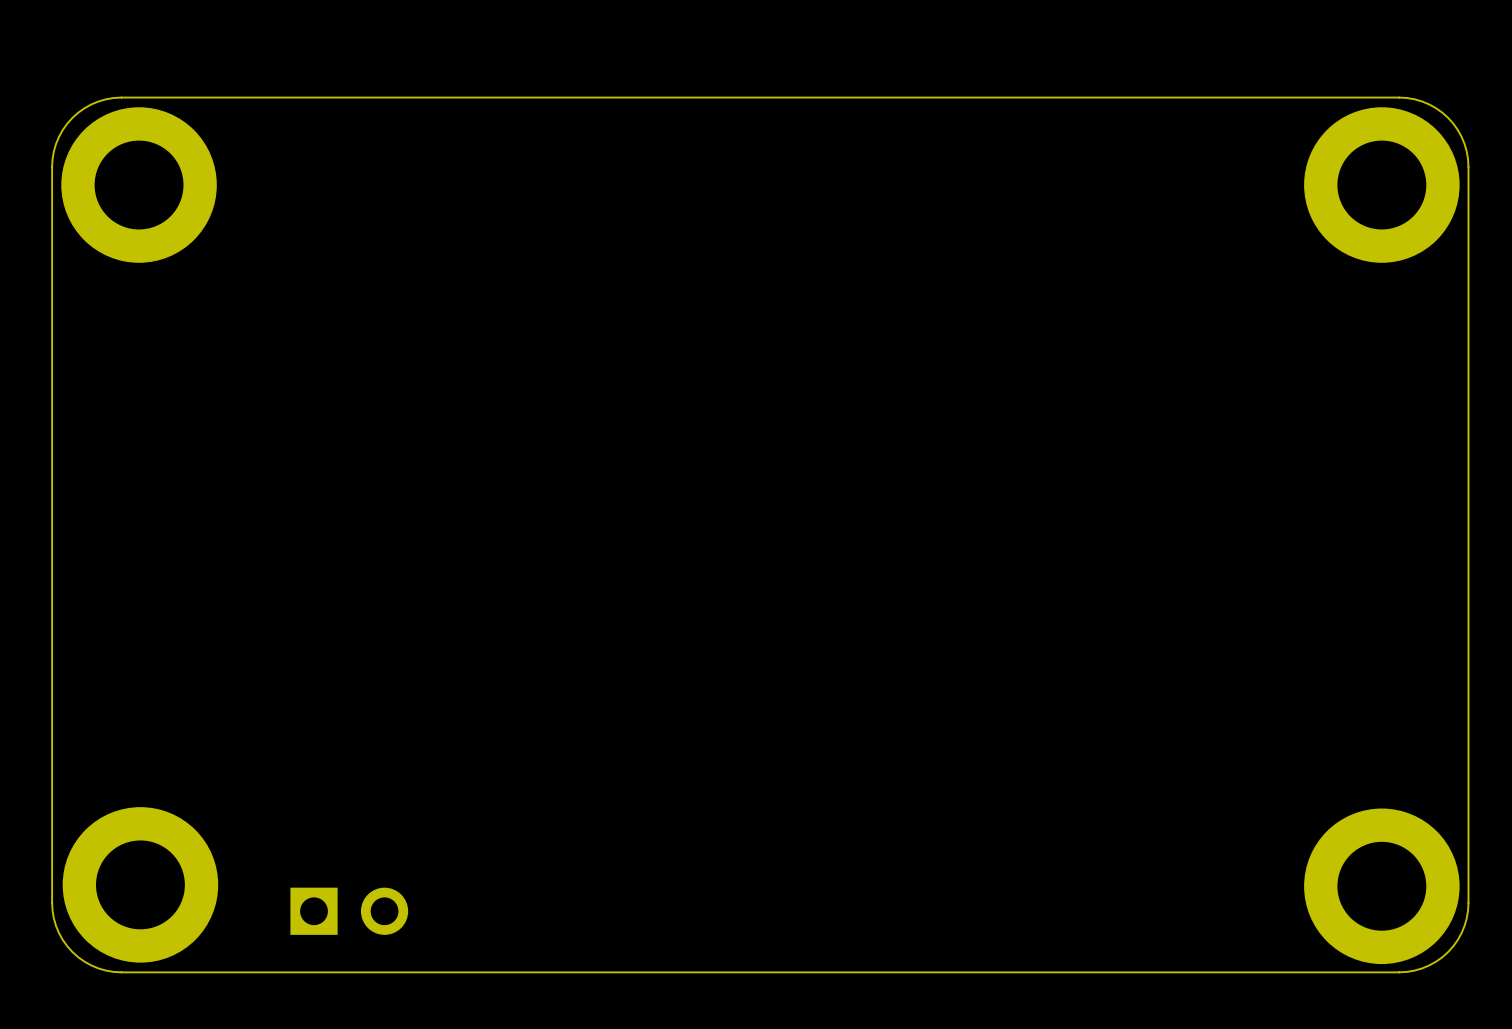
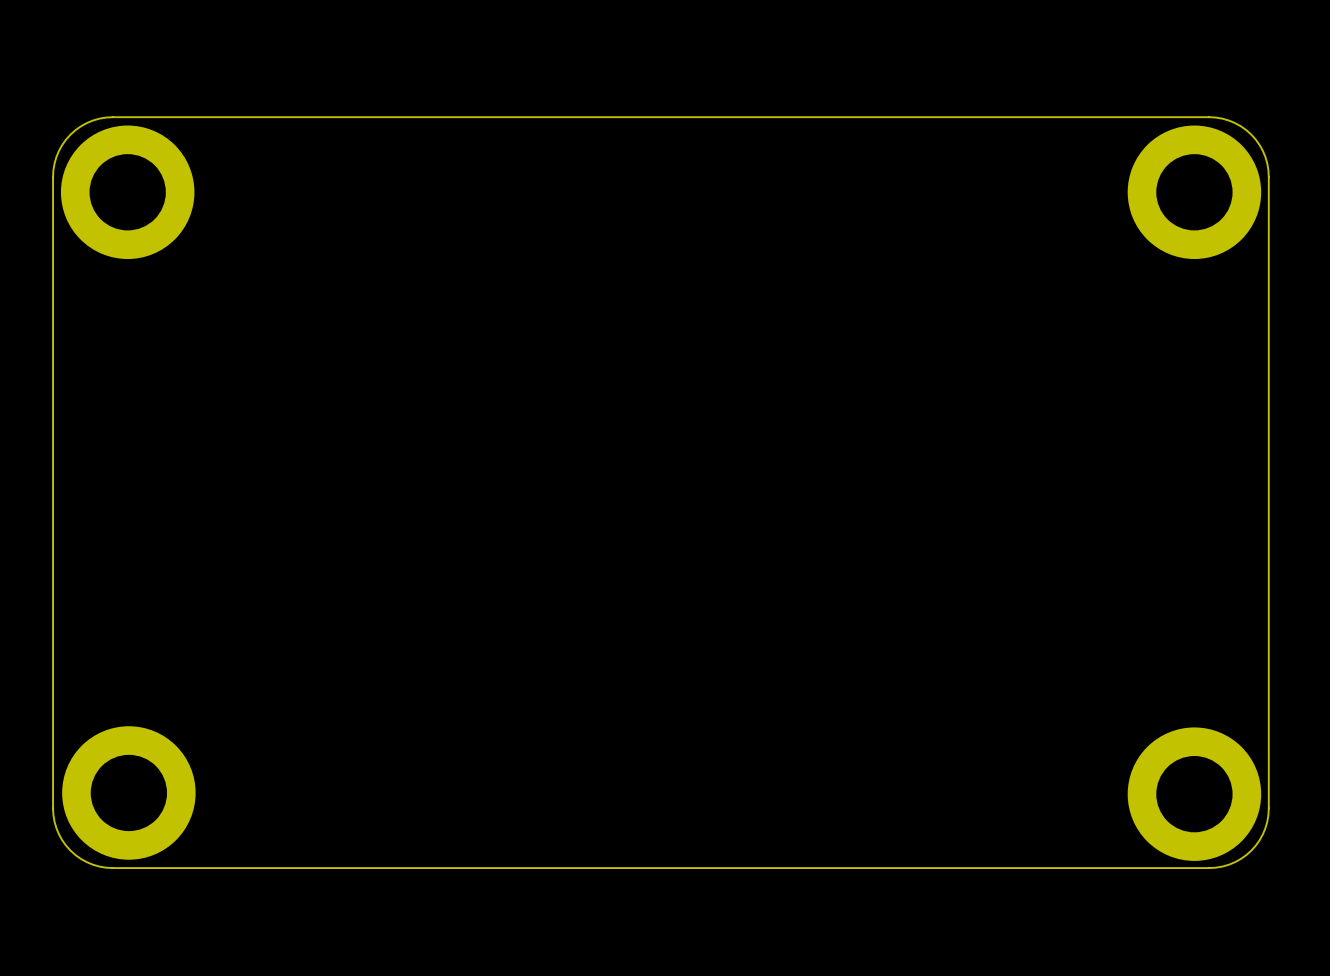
part: (349, 911) -> none

